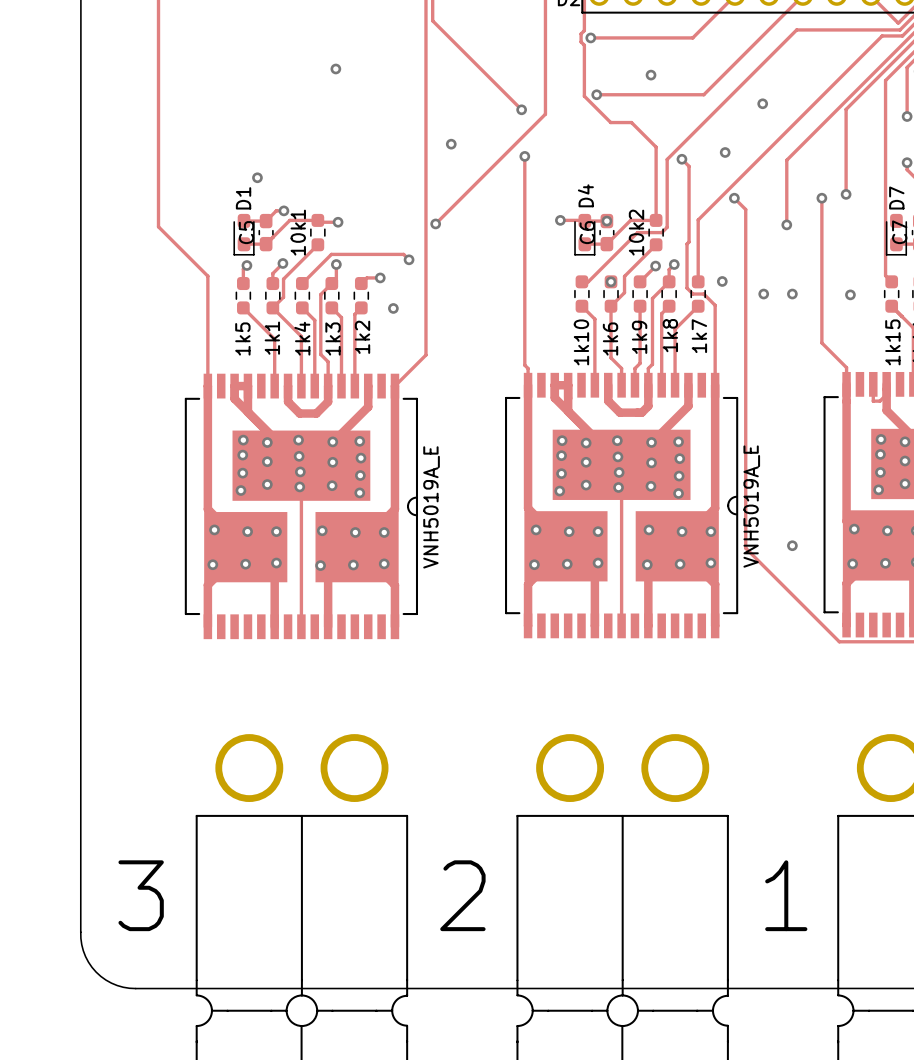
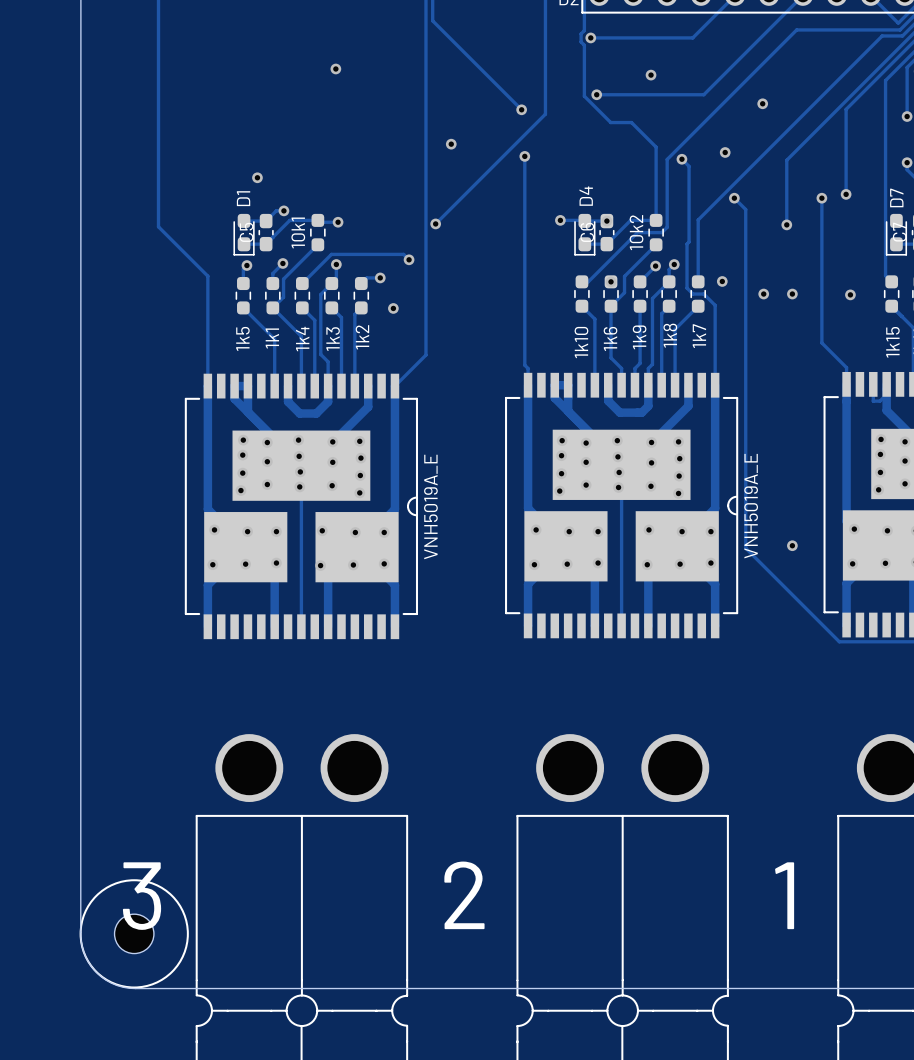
part: none -> (134, 933)

